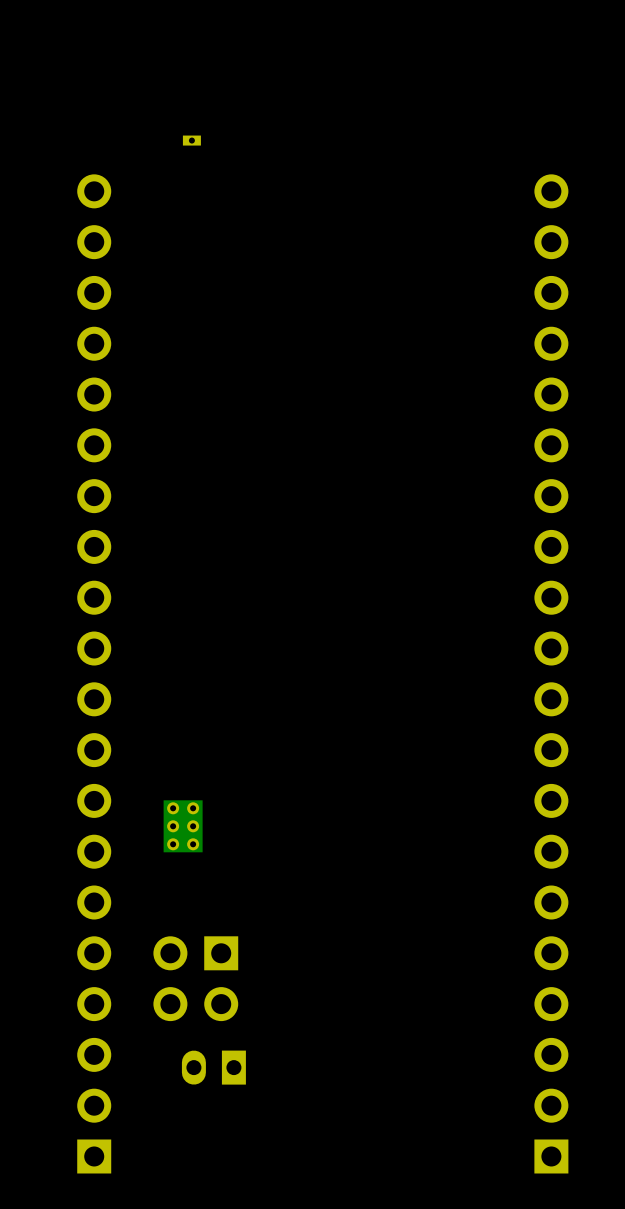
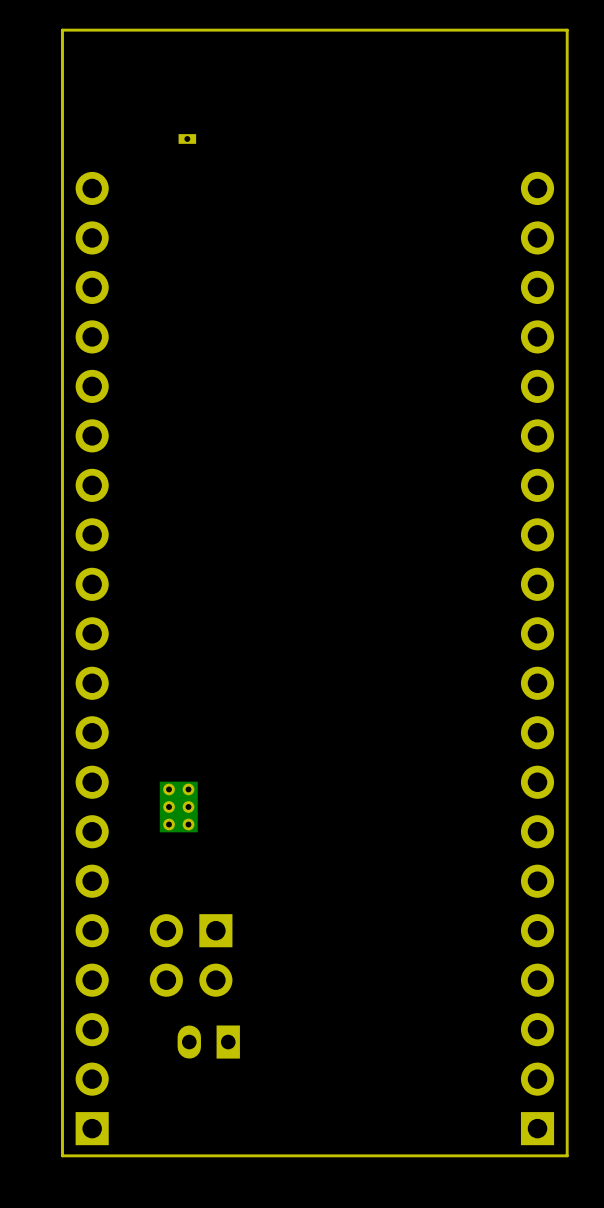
board edge: none -> (567, 30) (567, 1155) (62, 1155) (62, 30) (567, 30)

